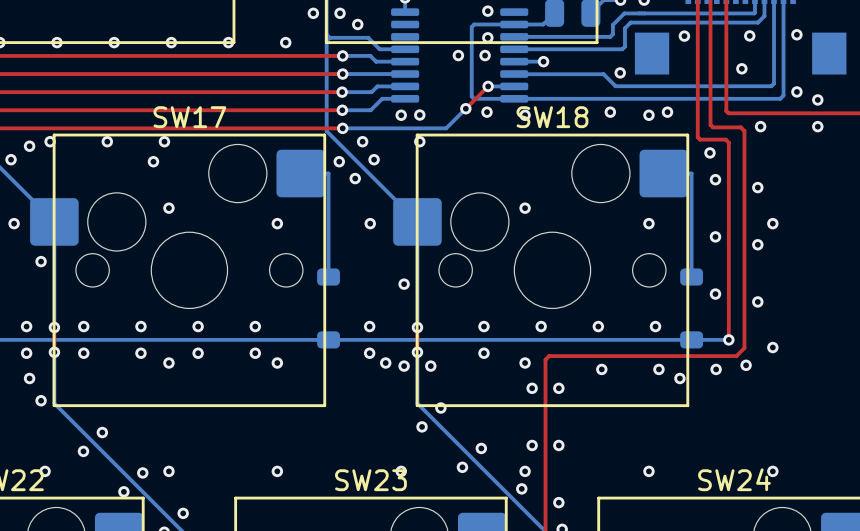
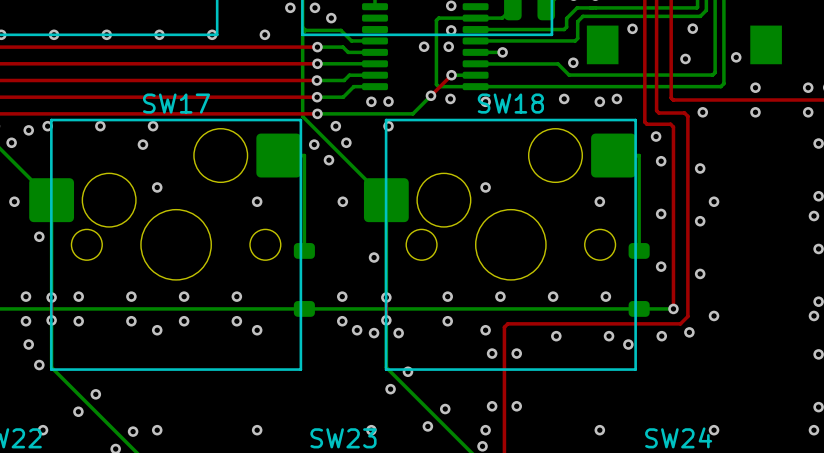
via: (796, 34) -> none
via: none -> (736, 57)
via: (796, 91) -> none

